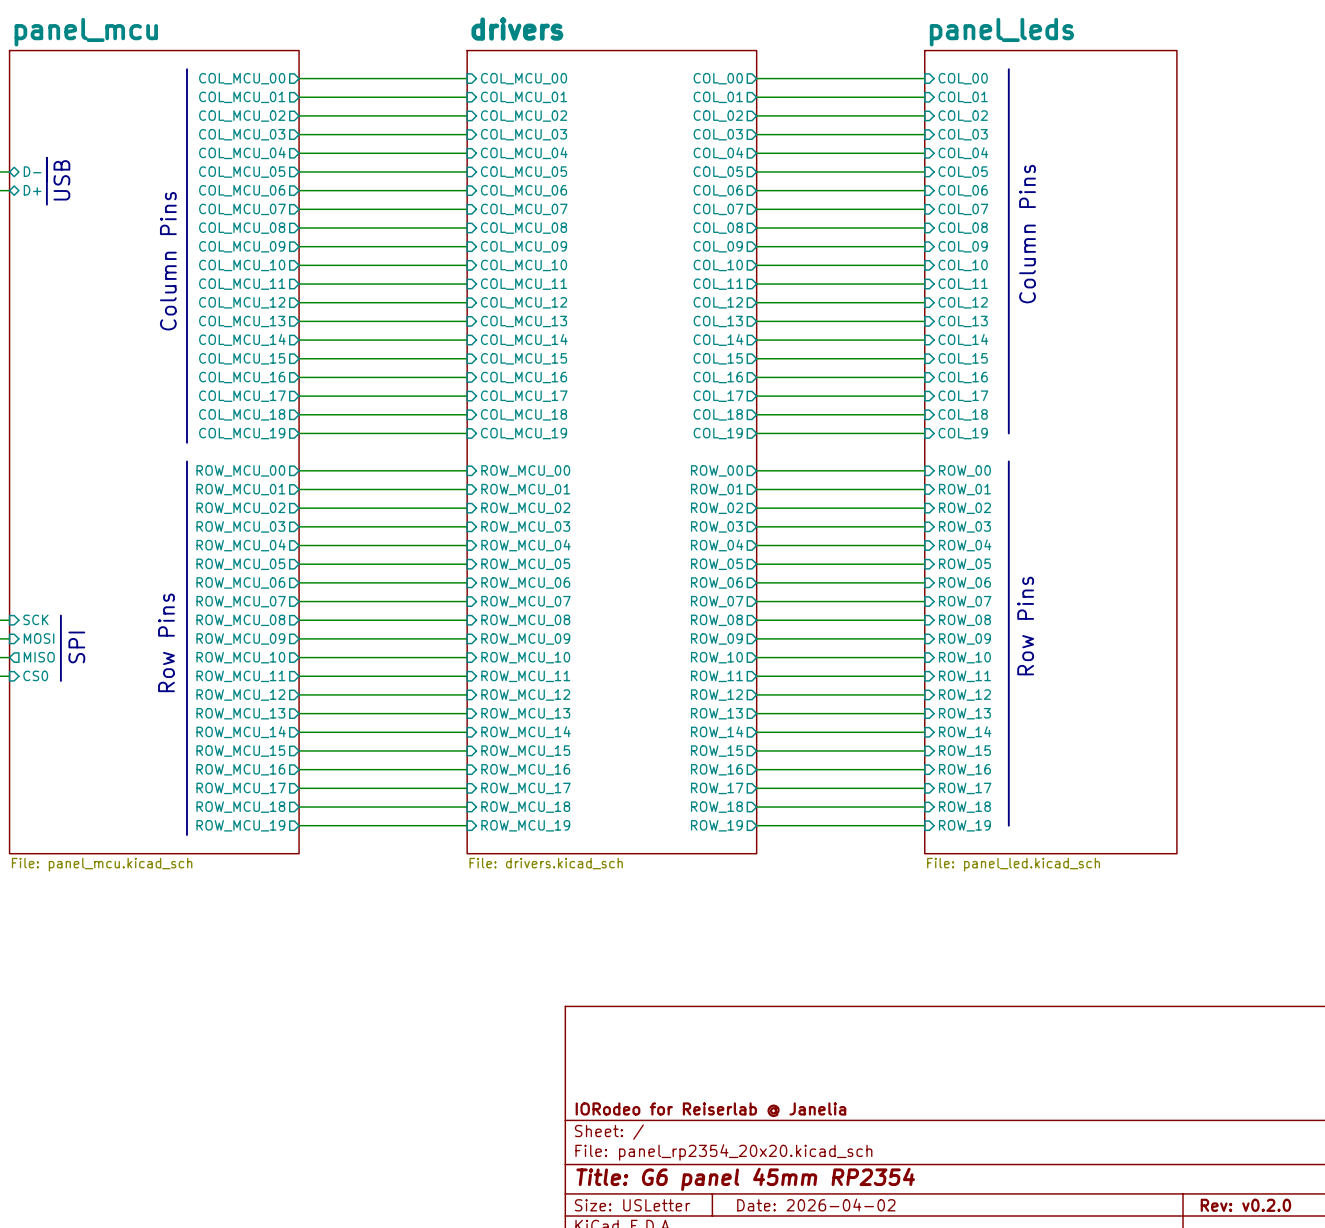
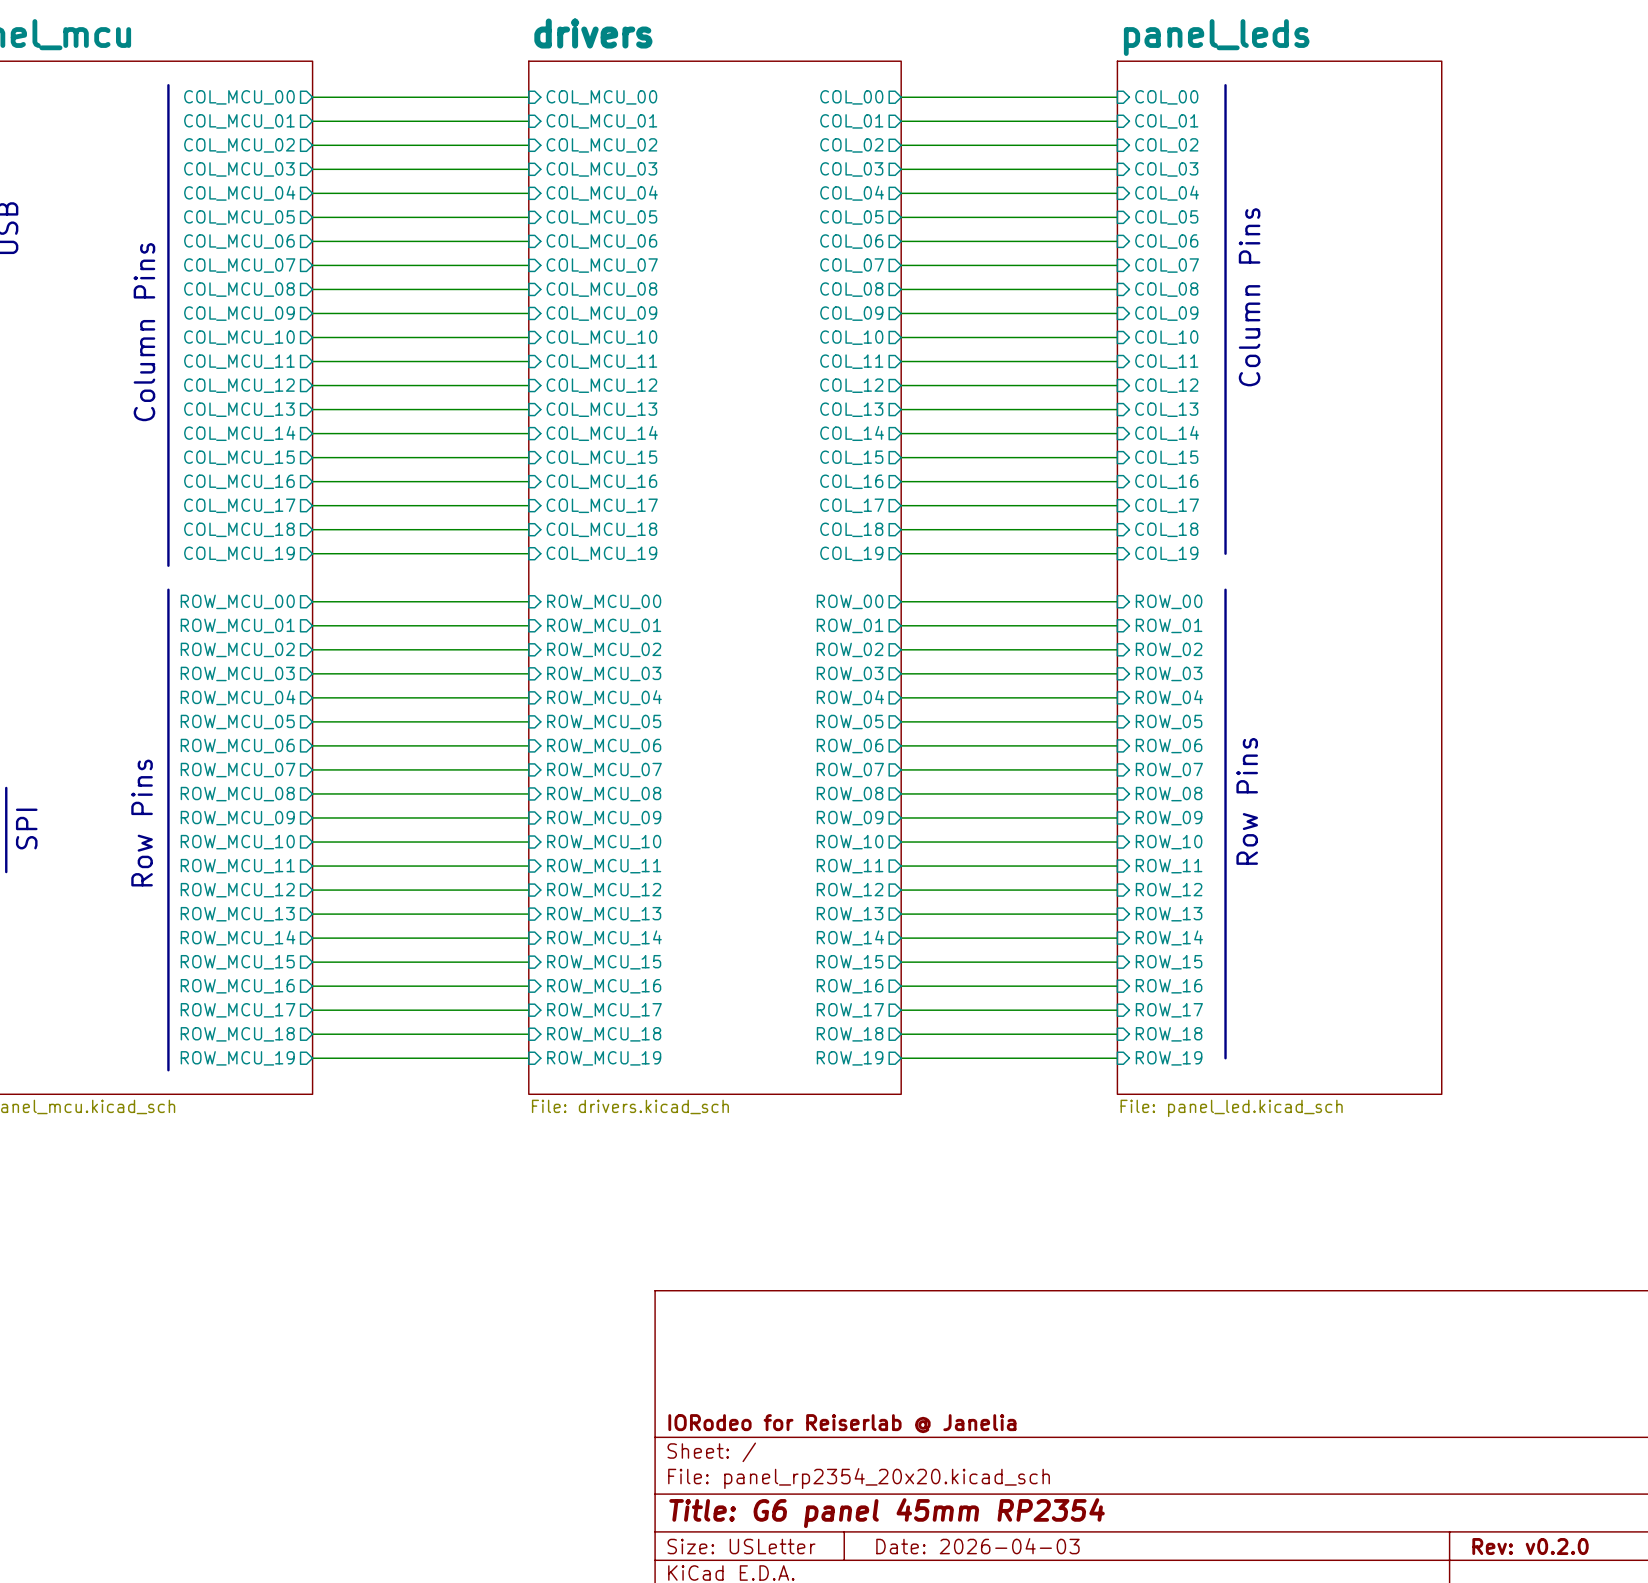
title block: Date: 2026-04-02 (816, 1205) -> Date: 2026-04-03 (977, 1546)

